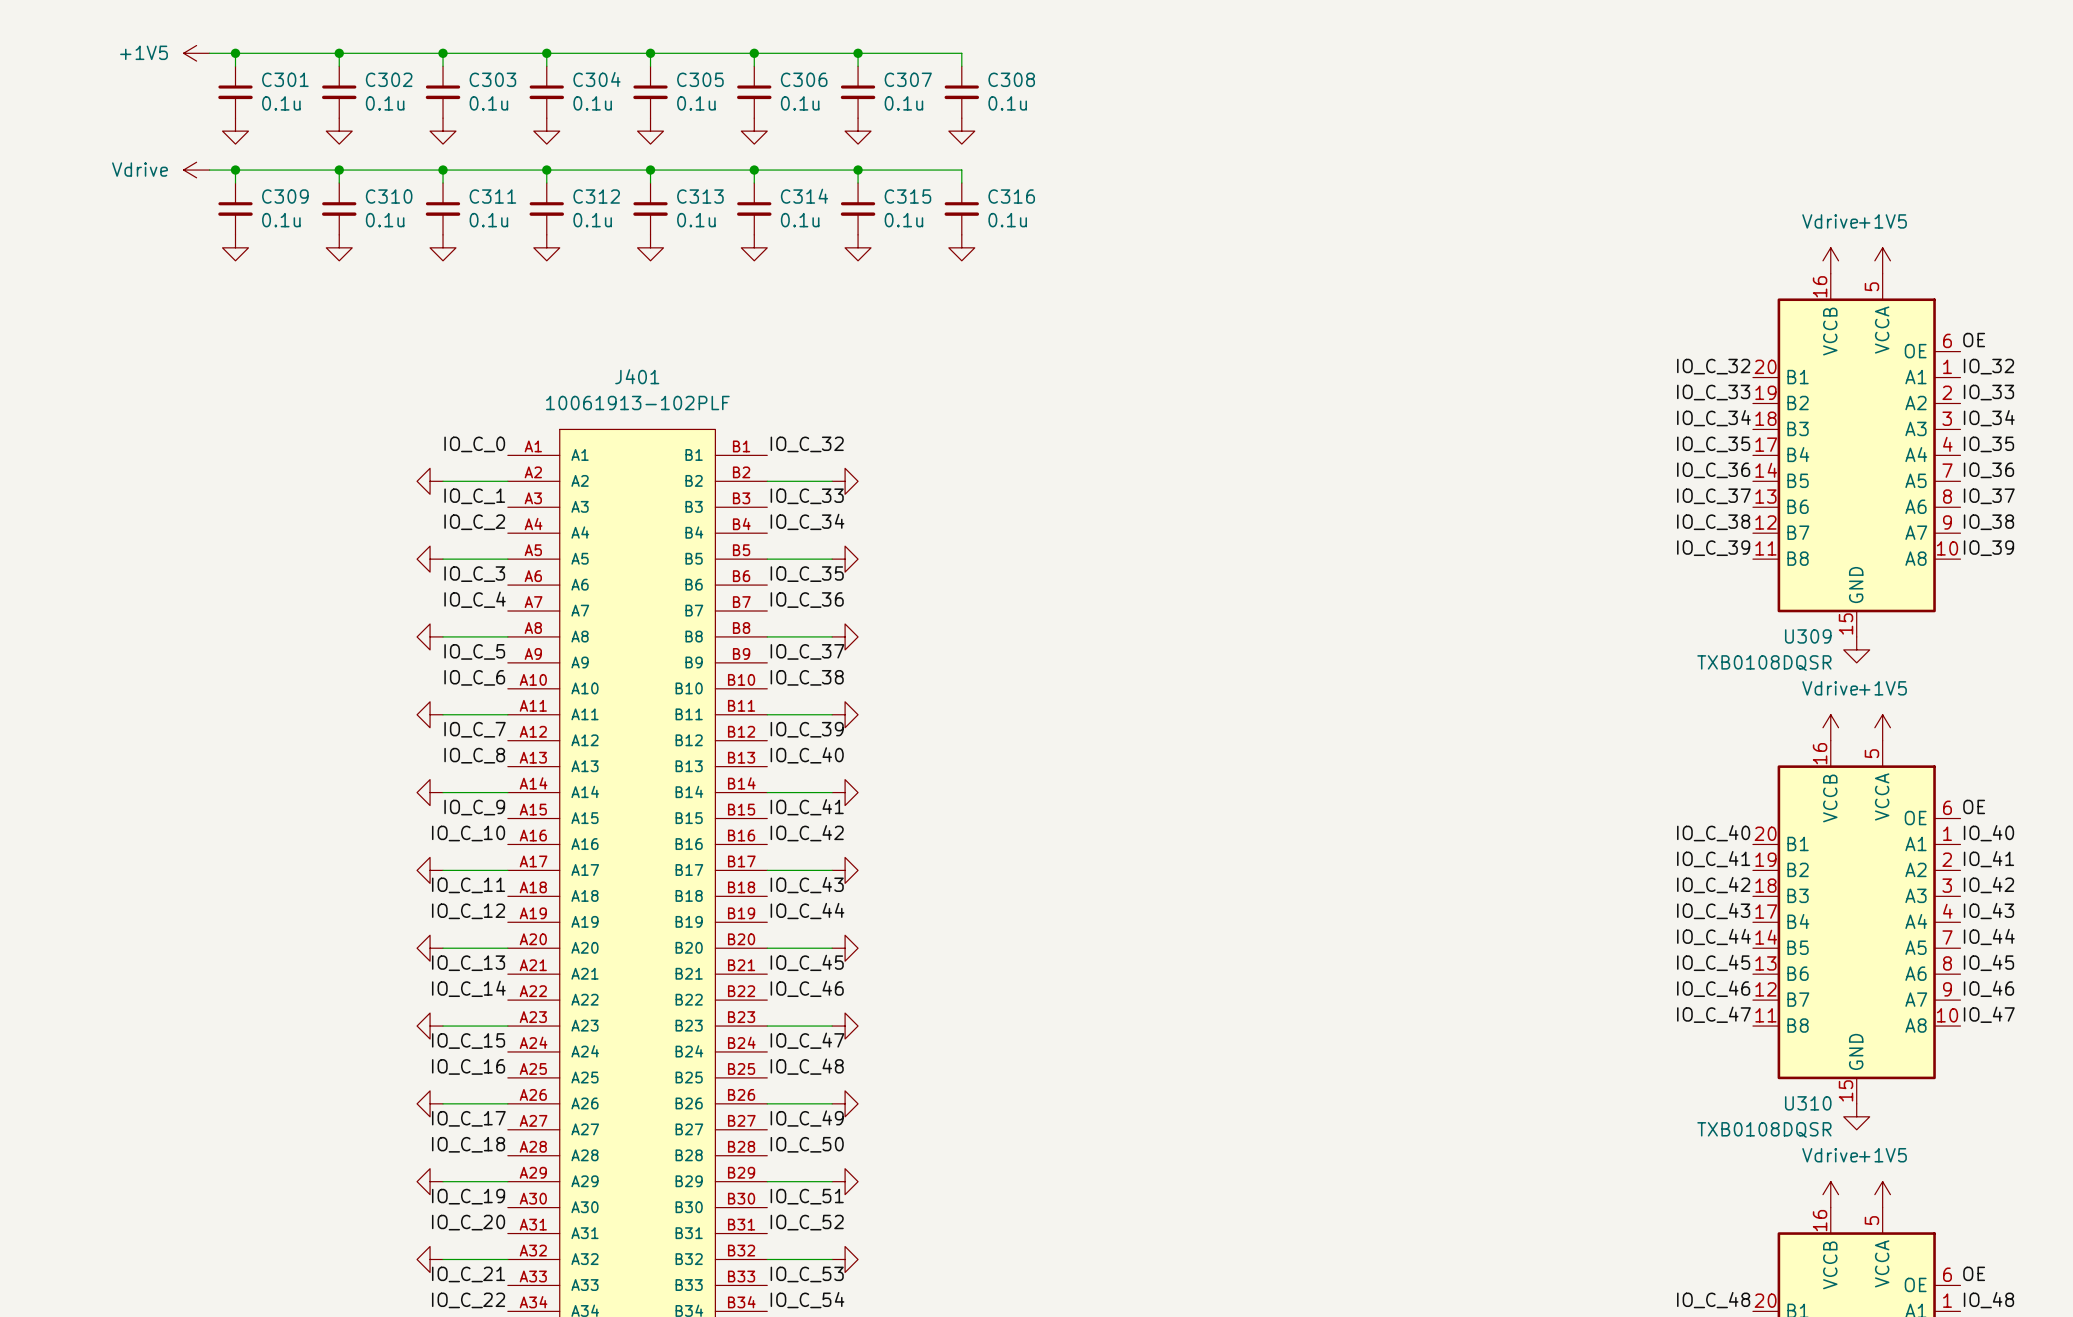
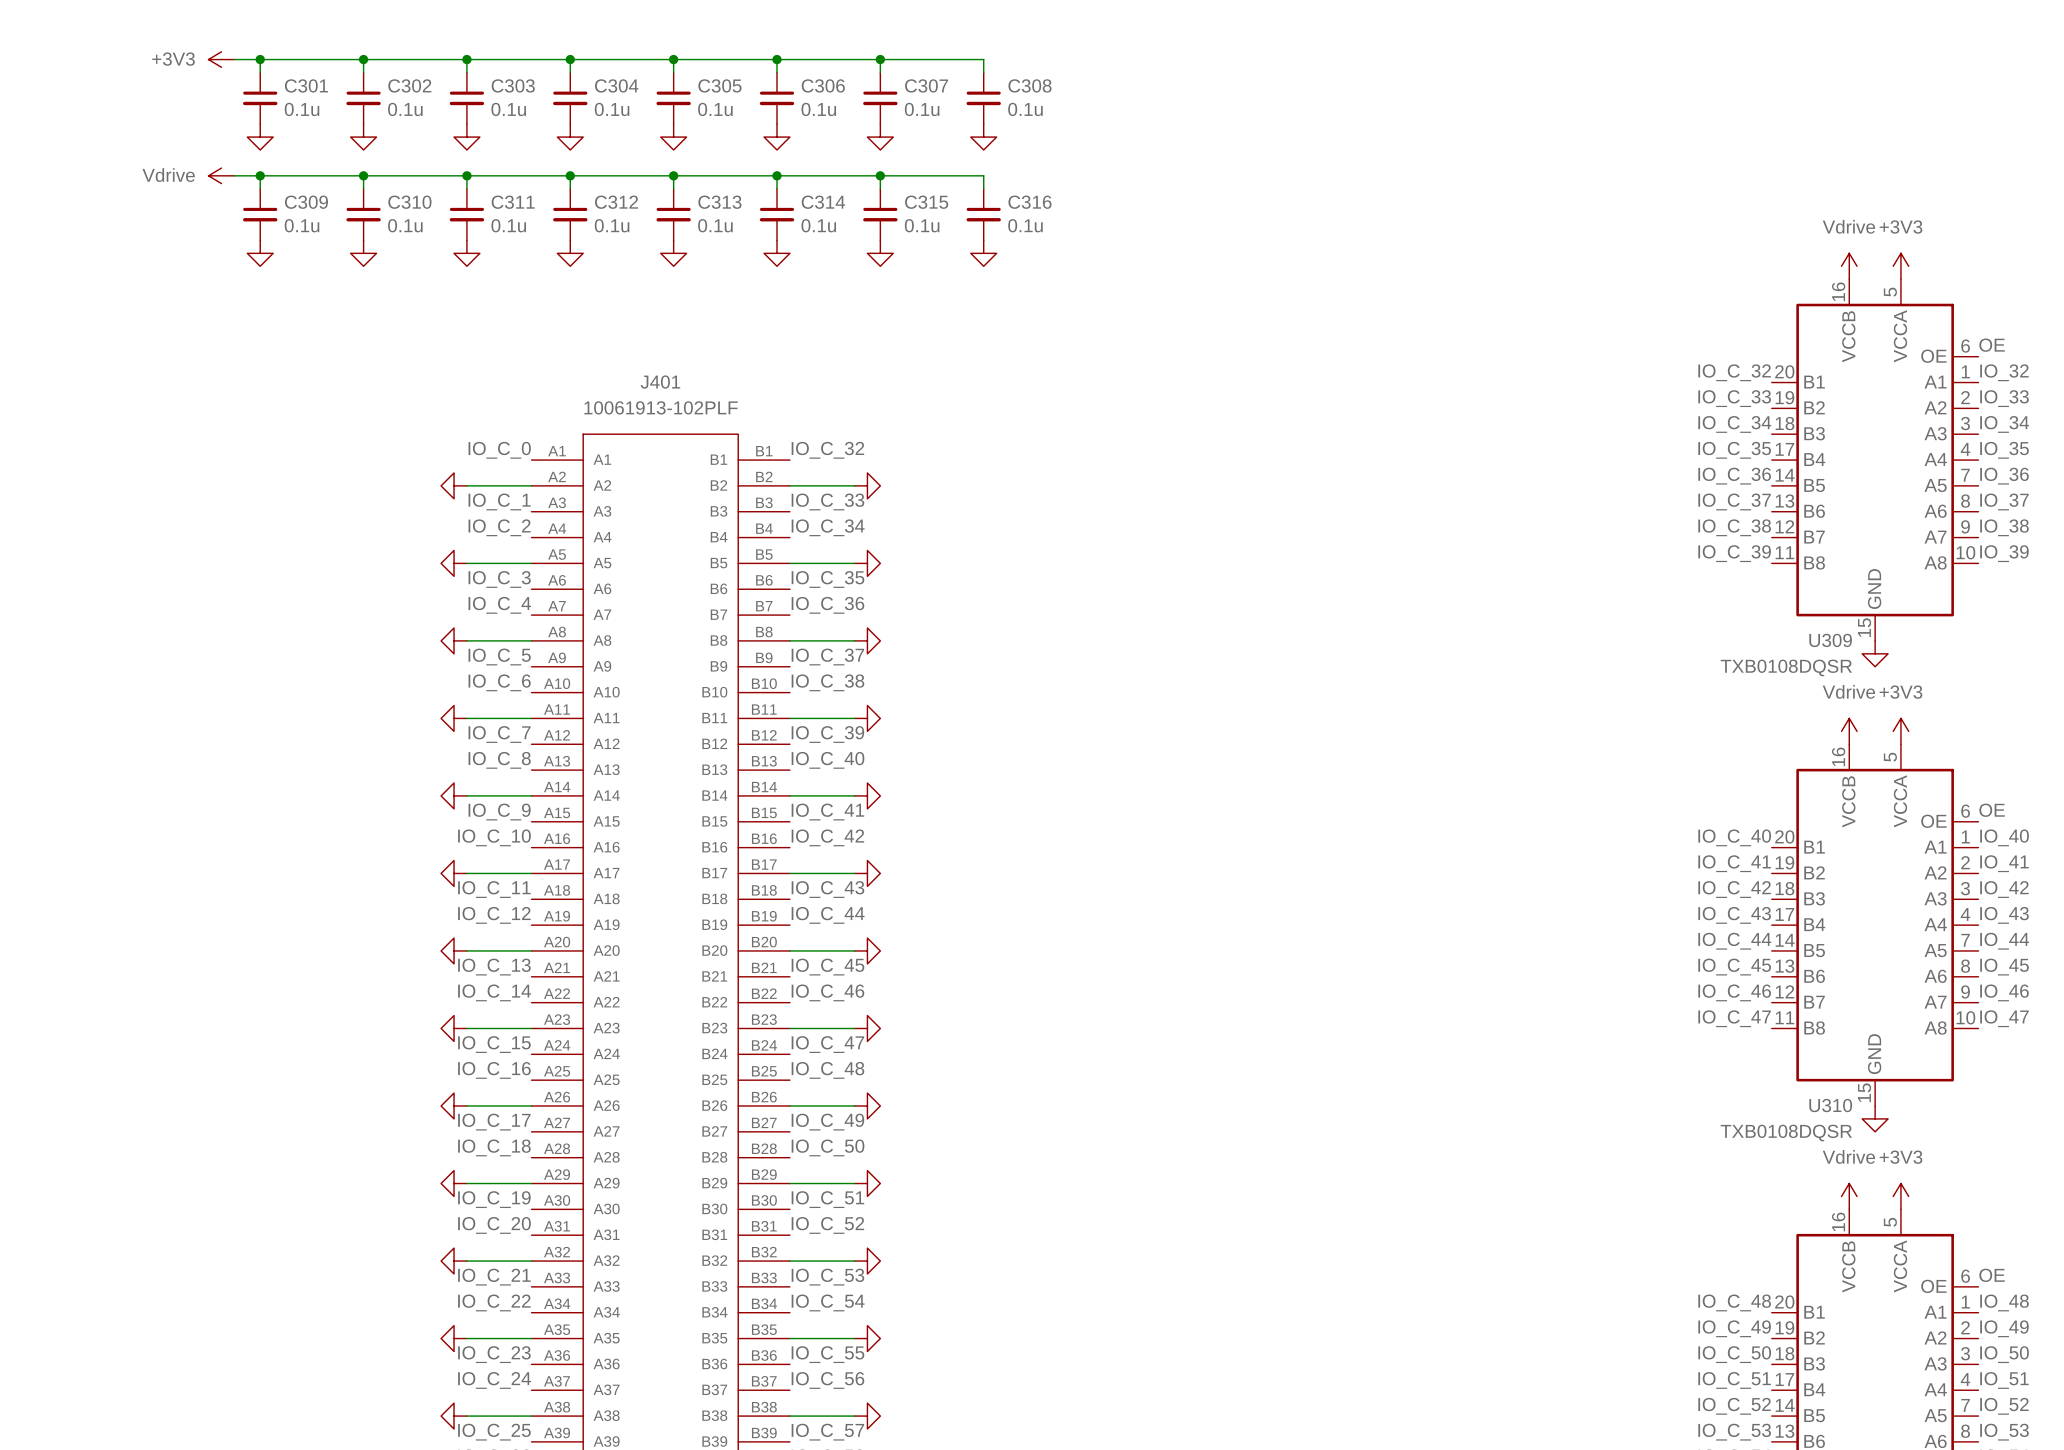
power symbol: +1V5 (196, 53) -> +3V3 (221, 59)
power symbol: +1V5 (1882, 260) -> +3V3 (1900, 266)
power symbol: +1V5 (1882, 727) -> +3V3 (1900, 731)
power symbol: +1V5 (1882, 1194) -> +3V3 (1900, 1196)

